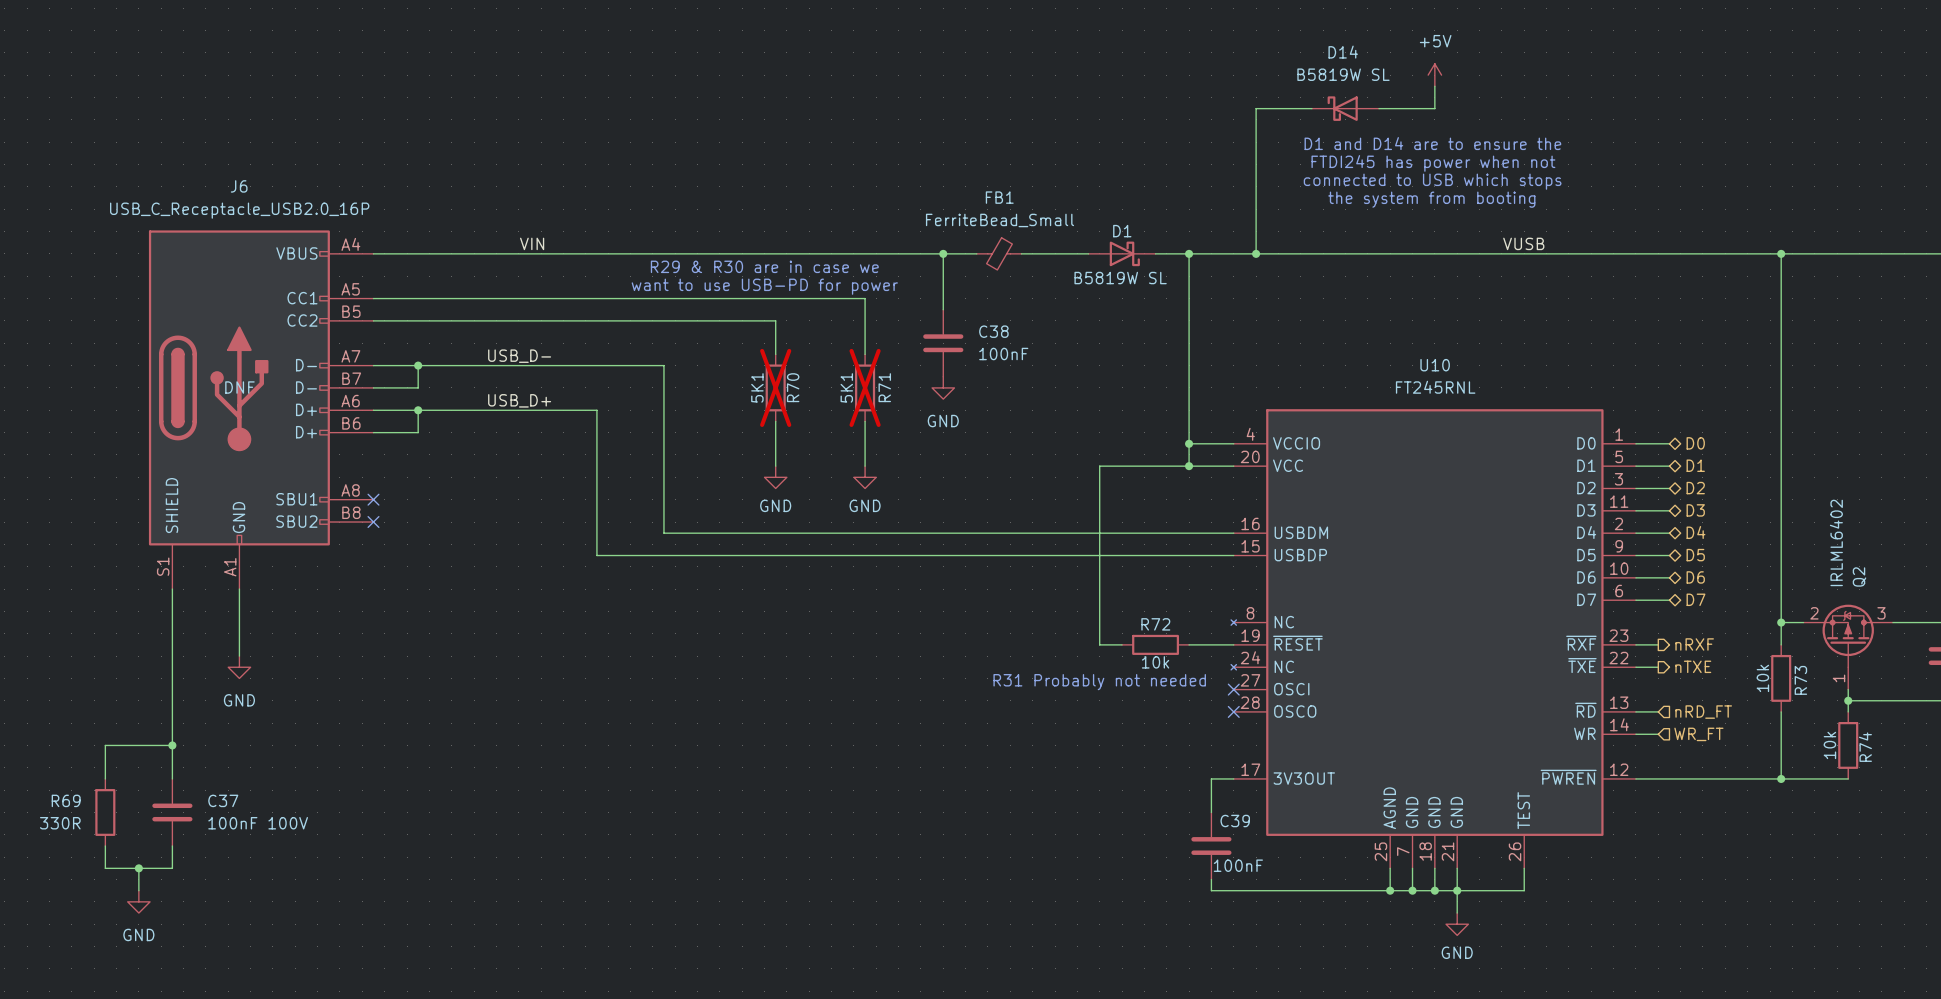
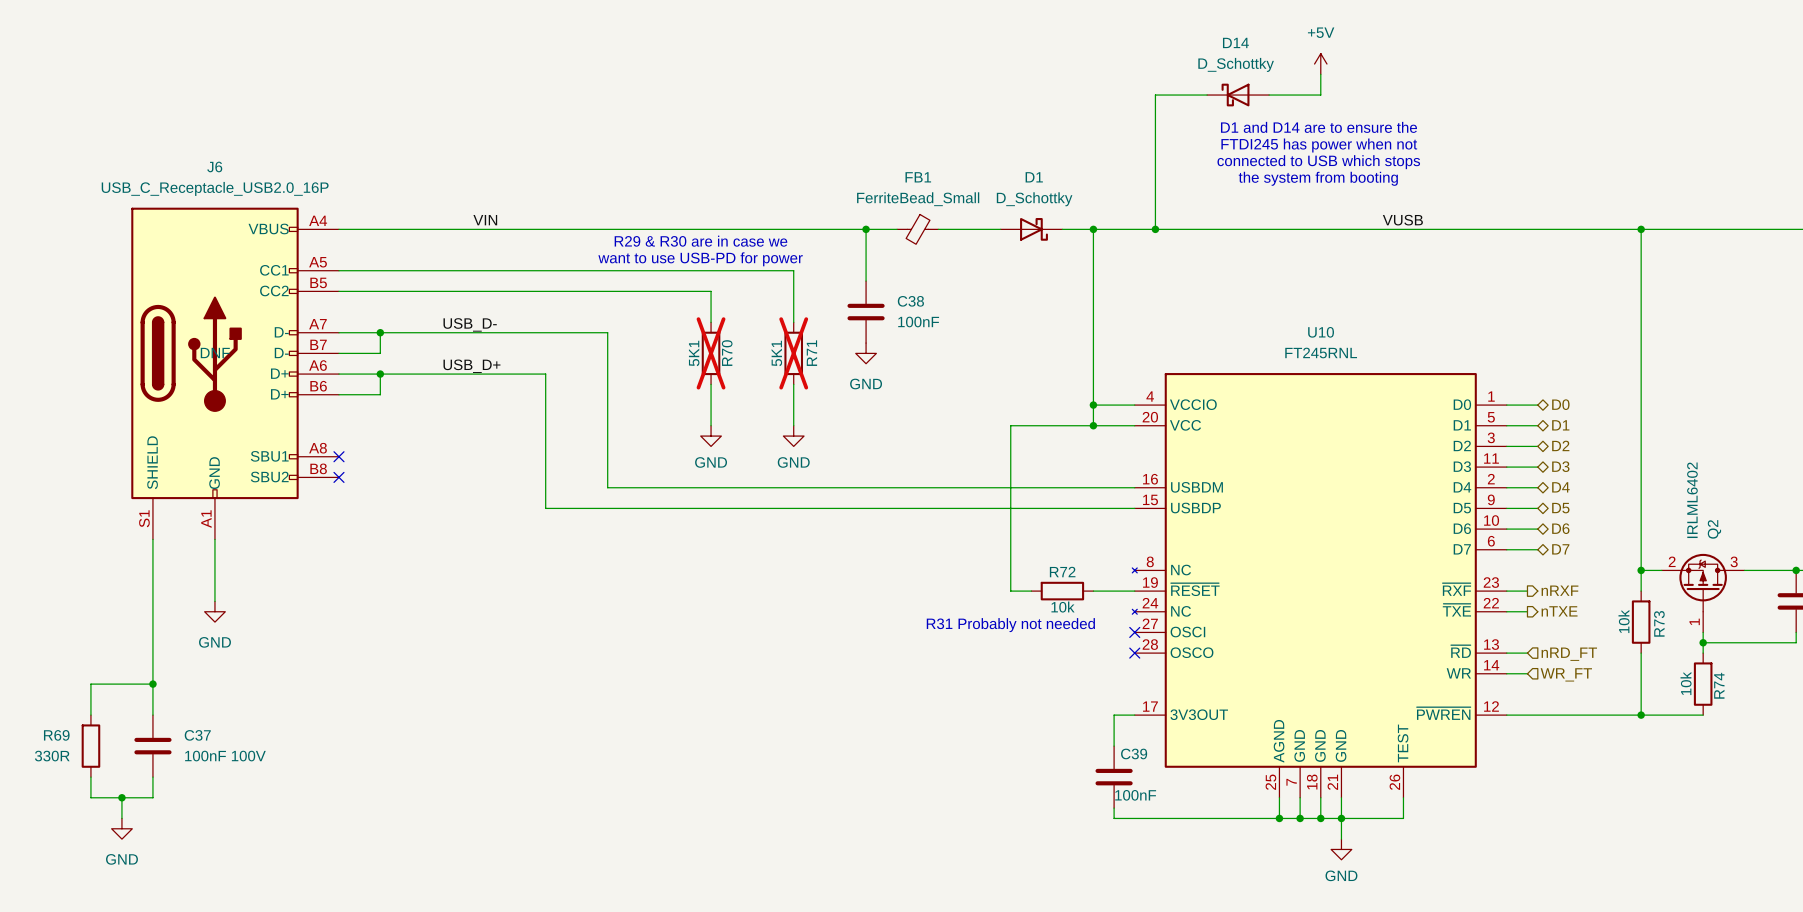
D14 value: B5819W SL (1343, 74) -> D_Schottky (1236, 64)
D1 name position: D1 (1122, 231) -> D1 (1034, 177)
D1 value: B5819W SL (1120, 278) -> D_Schottky (1034, 199)

